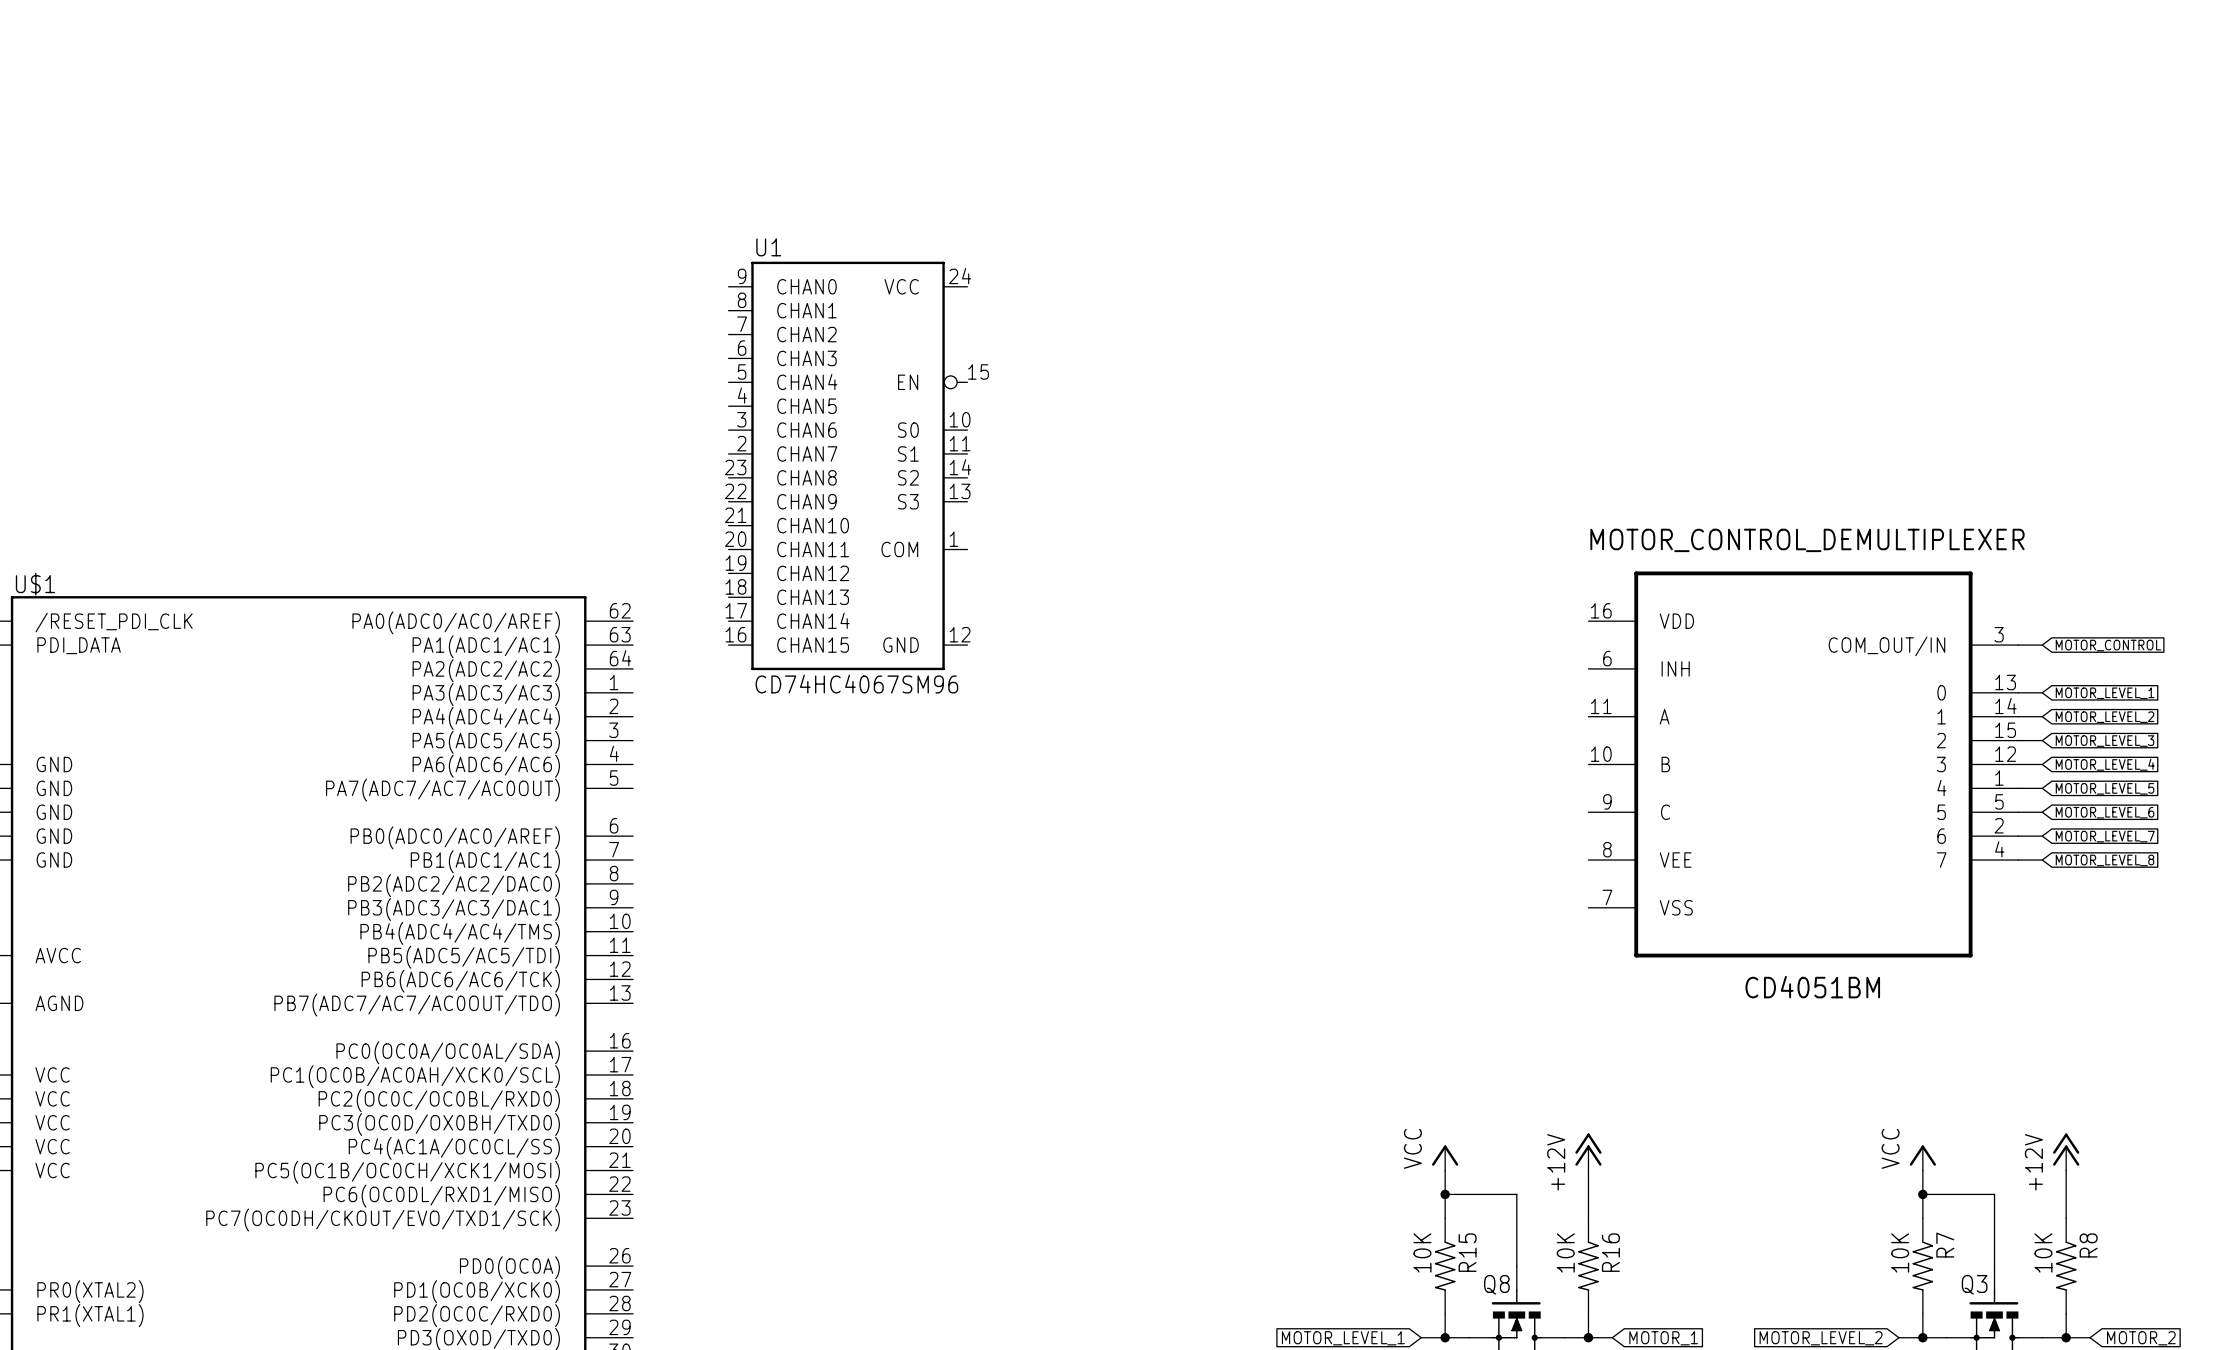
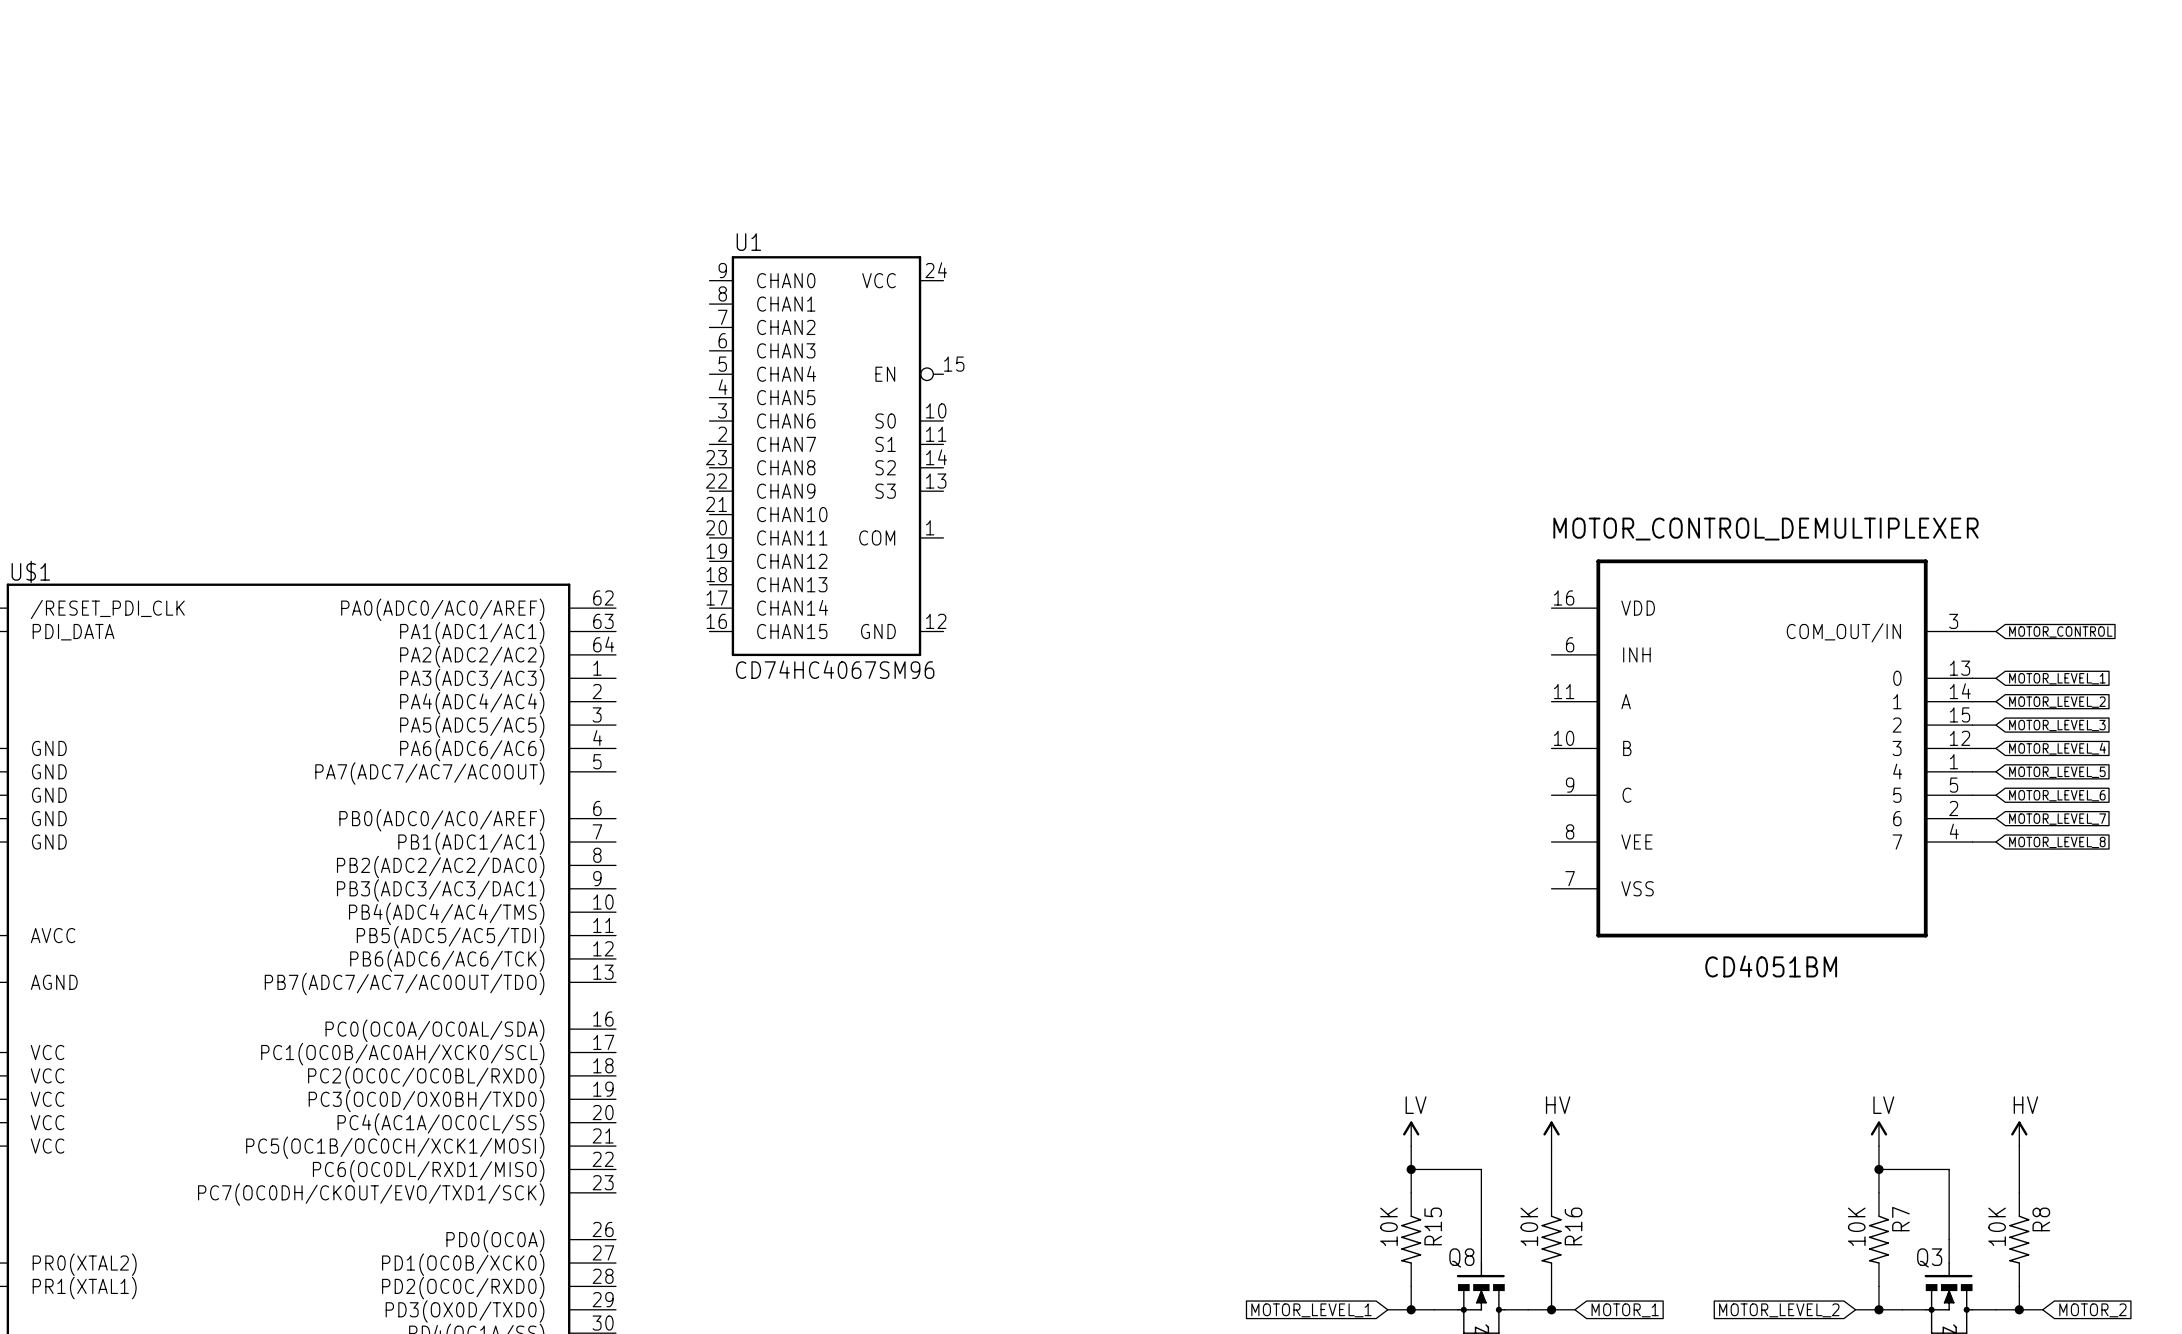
power symbol: +12V (1588, 1152) -> HV (1551, 1133)
power symbol: +12V (2066, 1152) -> HV (2019, 1133)
power symbol: VCC (1445, 1157) -> LV (1411, 1133)
power symbol: VCC (1922, 1157) -> LV (1878, 1133)

